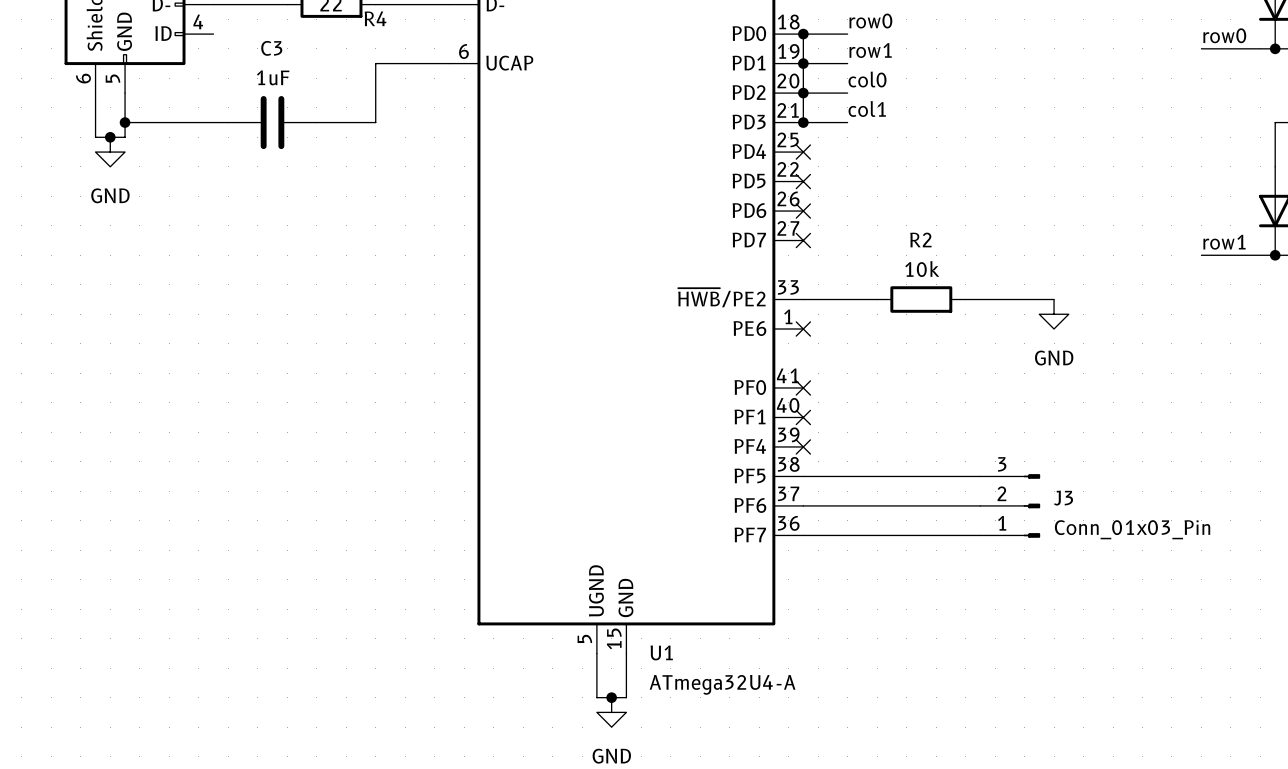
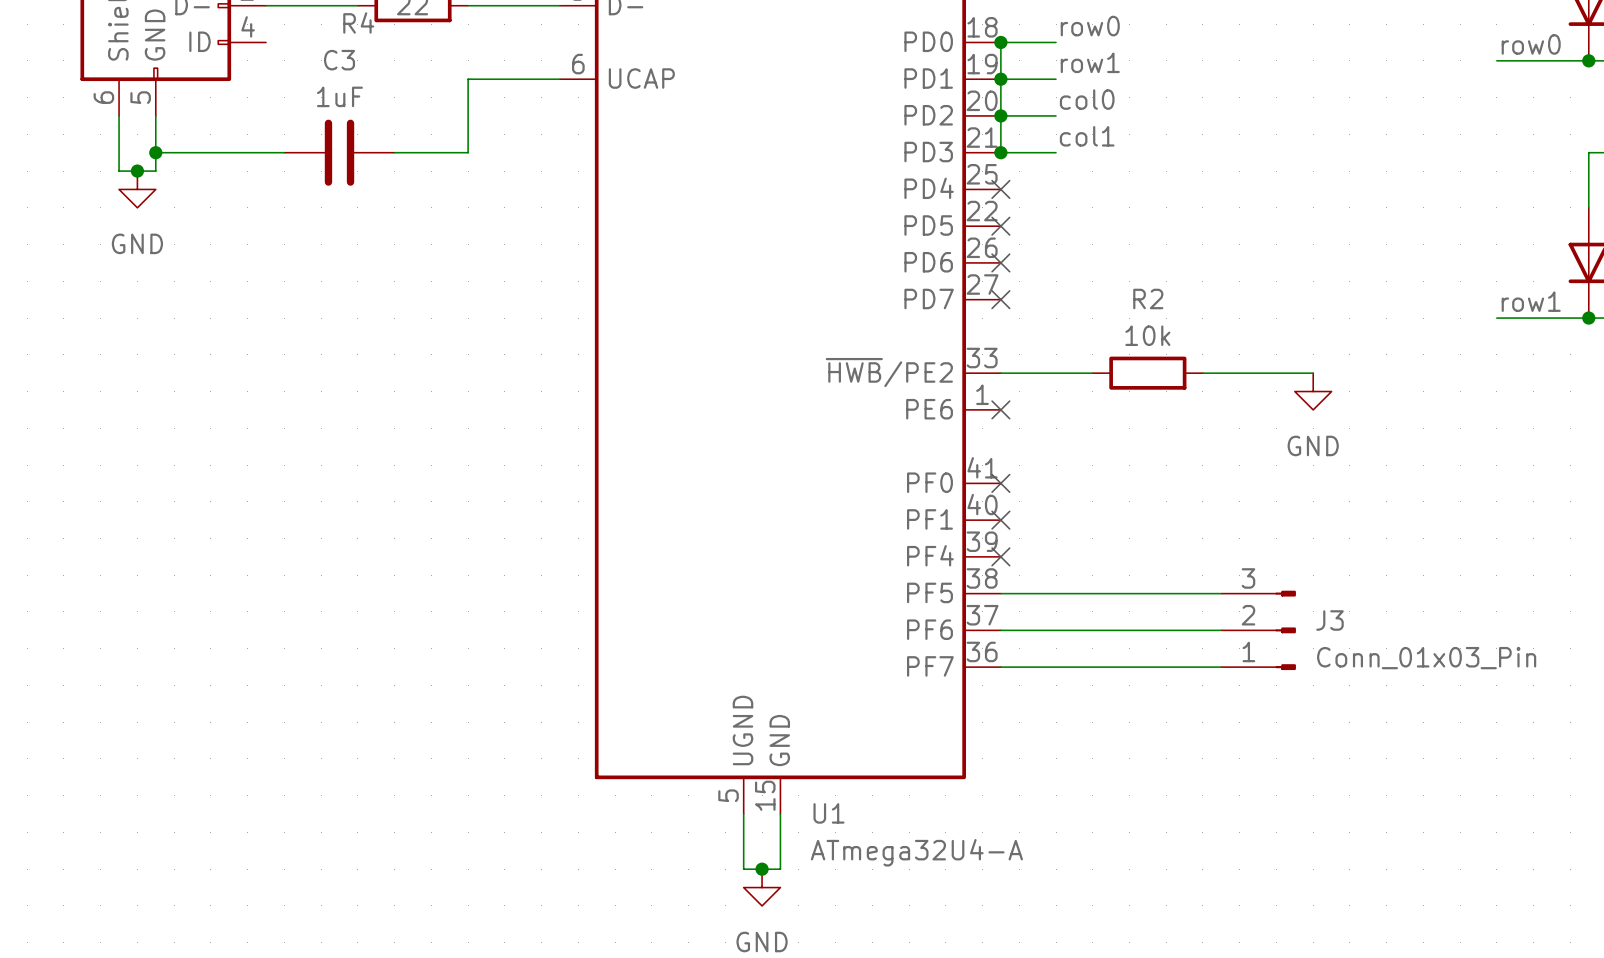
R4 name position: R4 (375, 18) -> R4 (358, 22)

